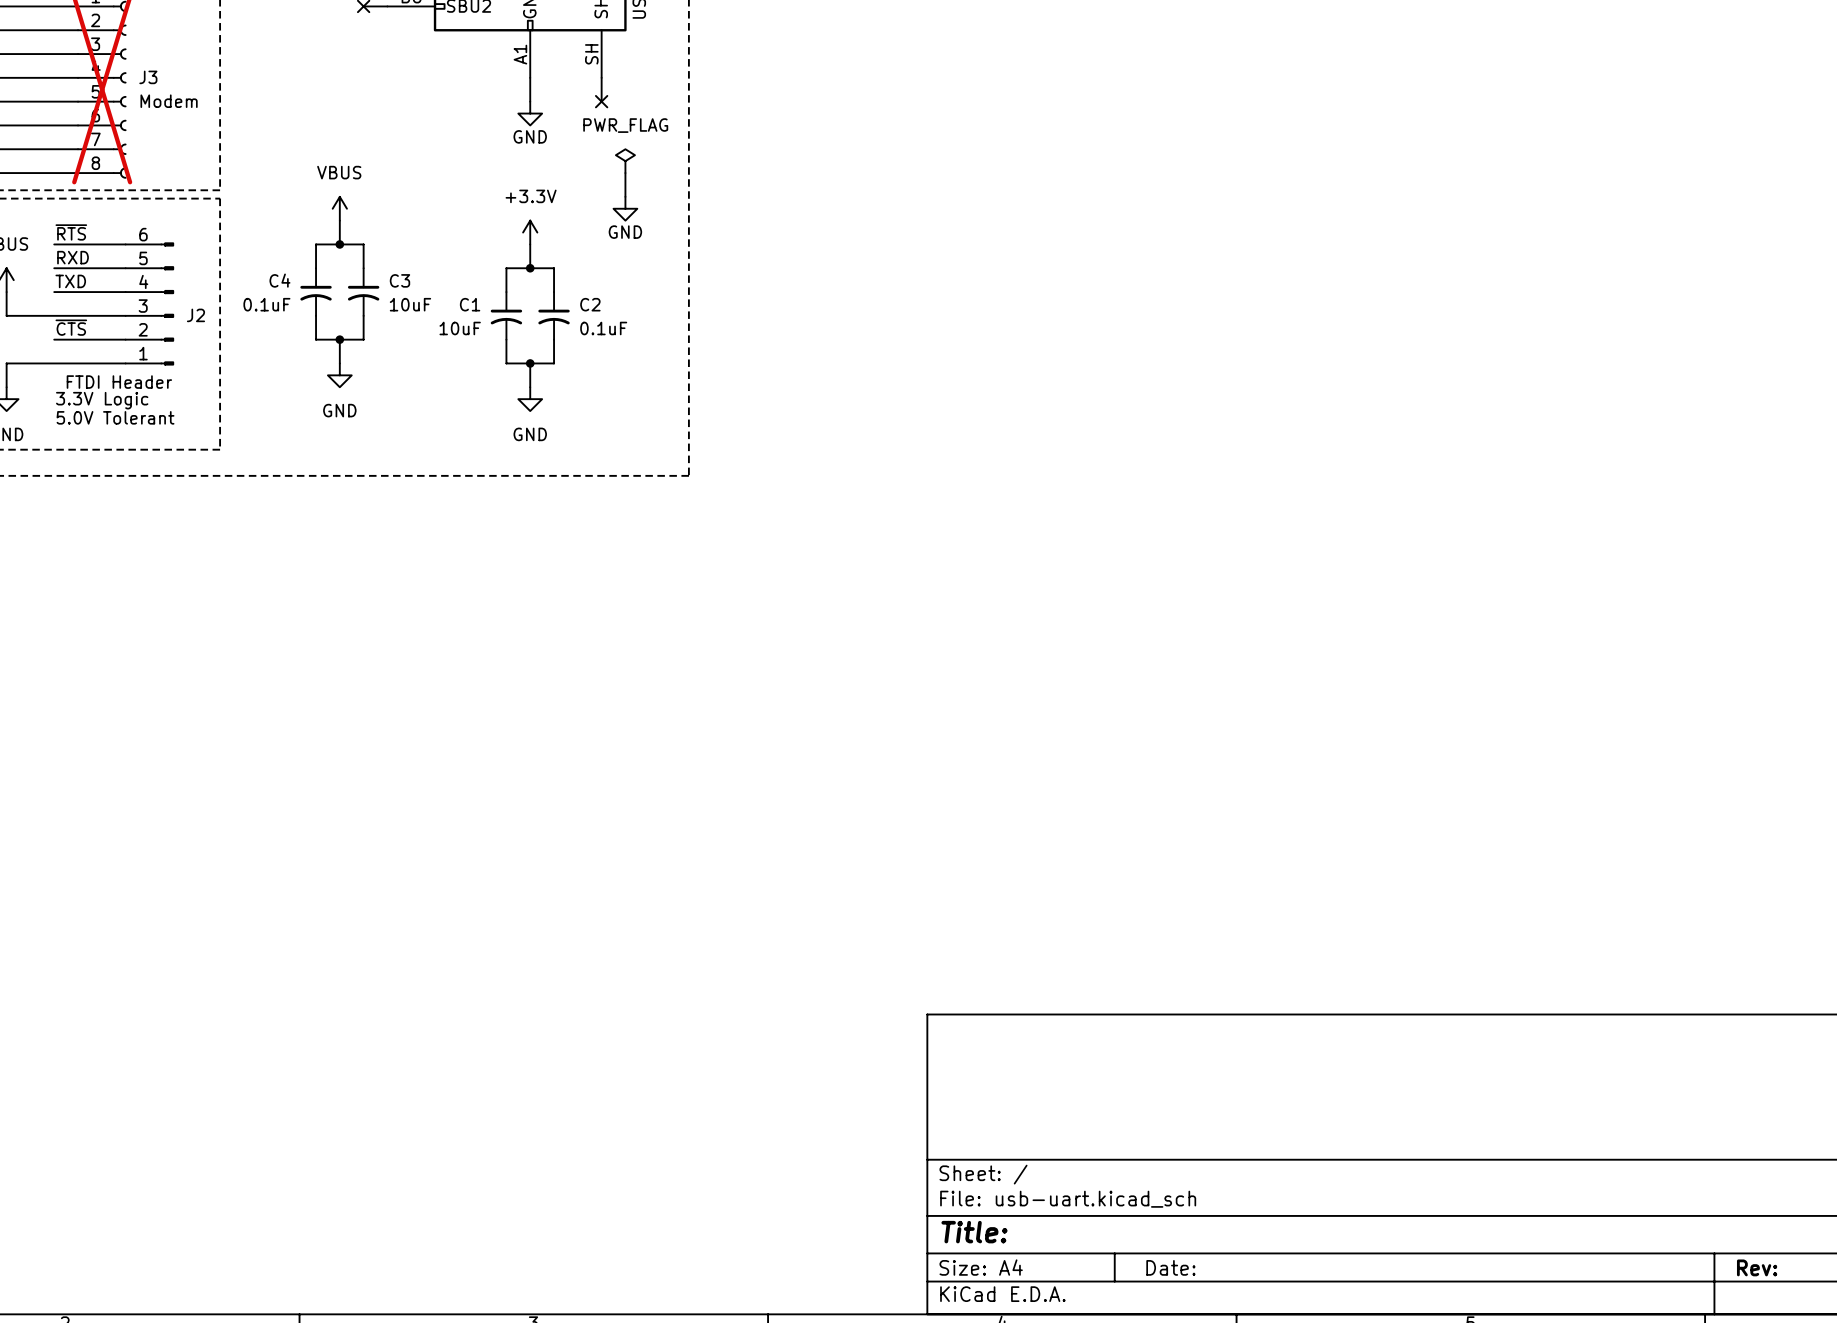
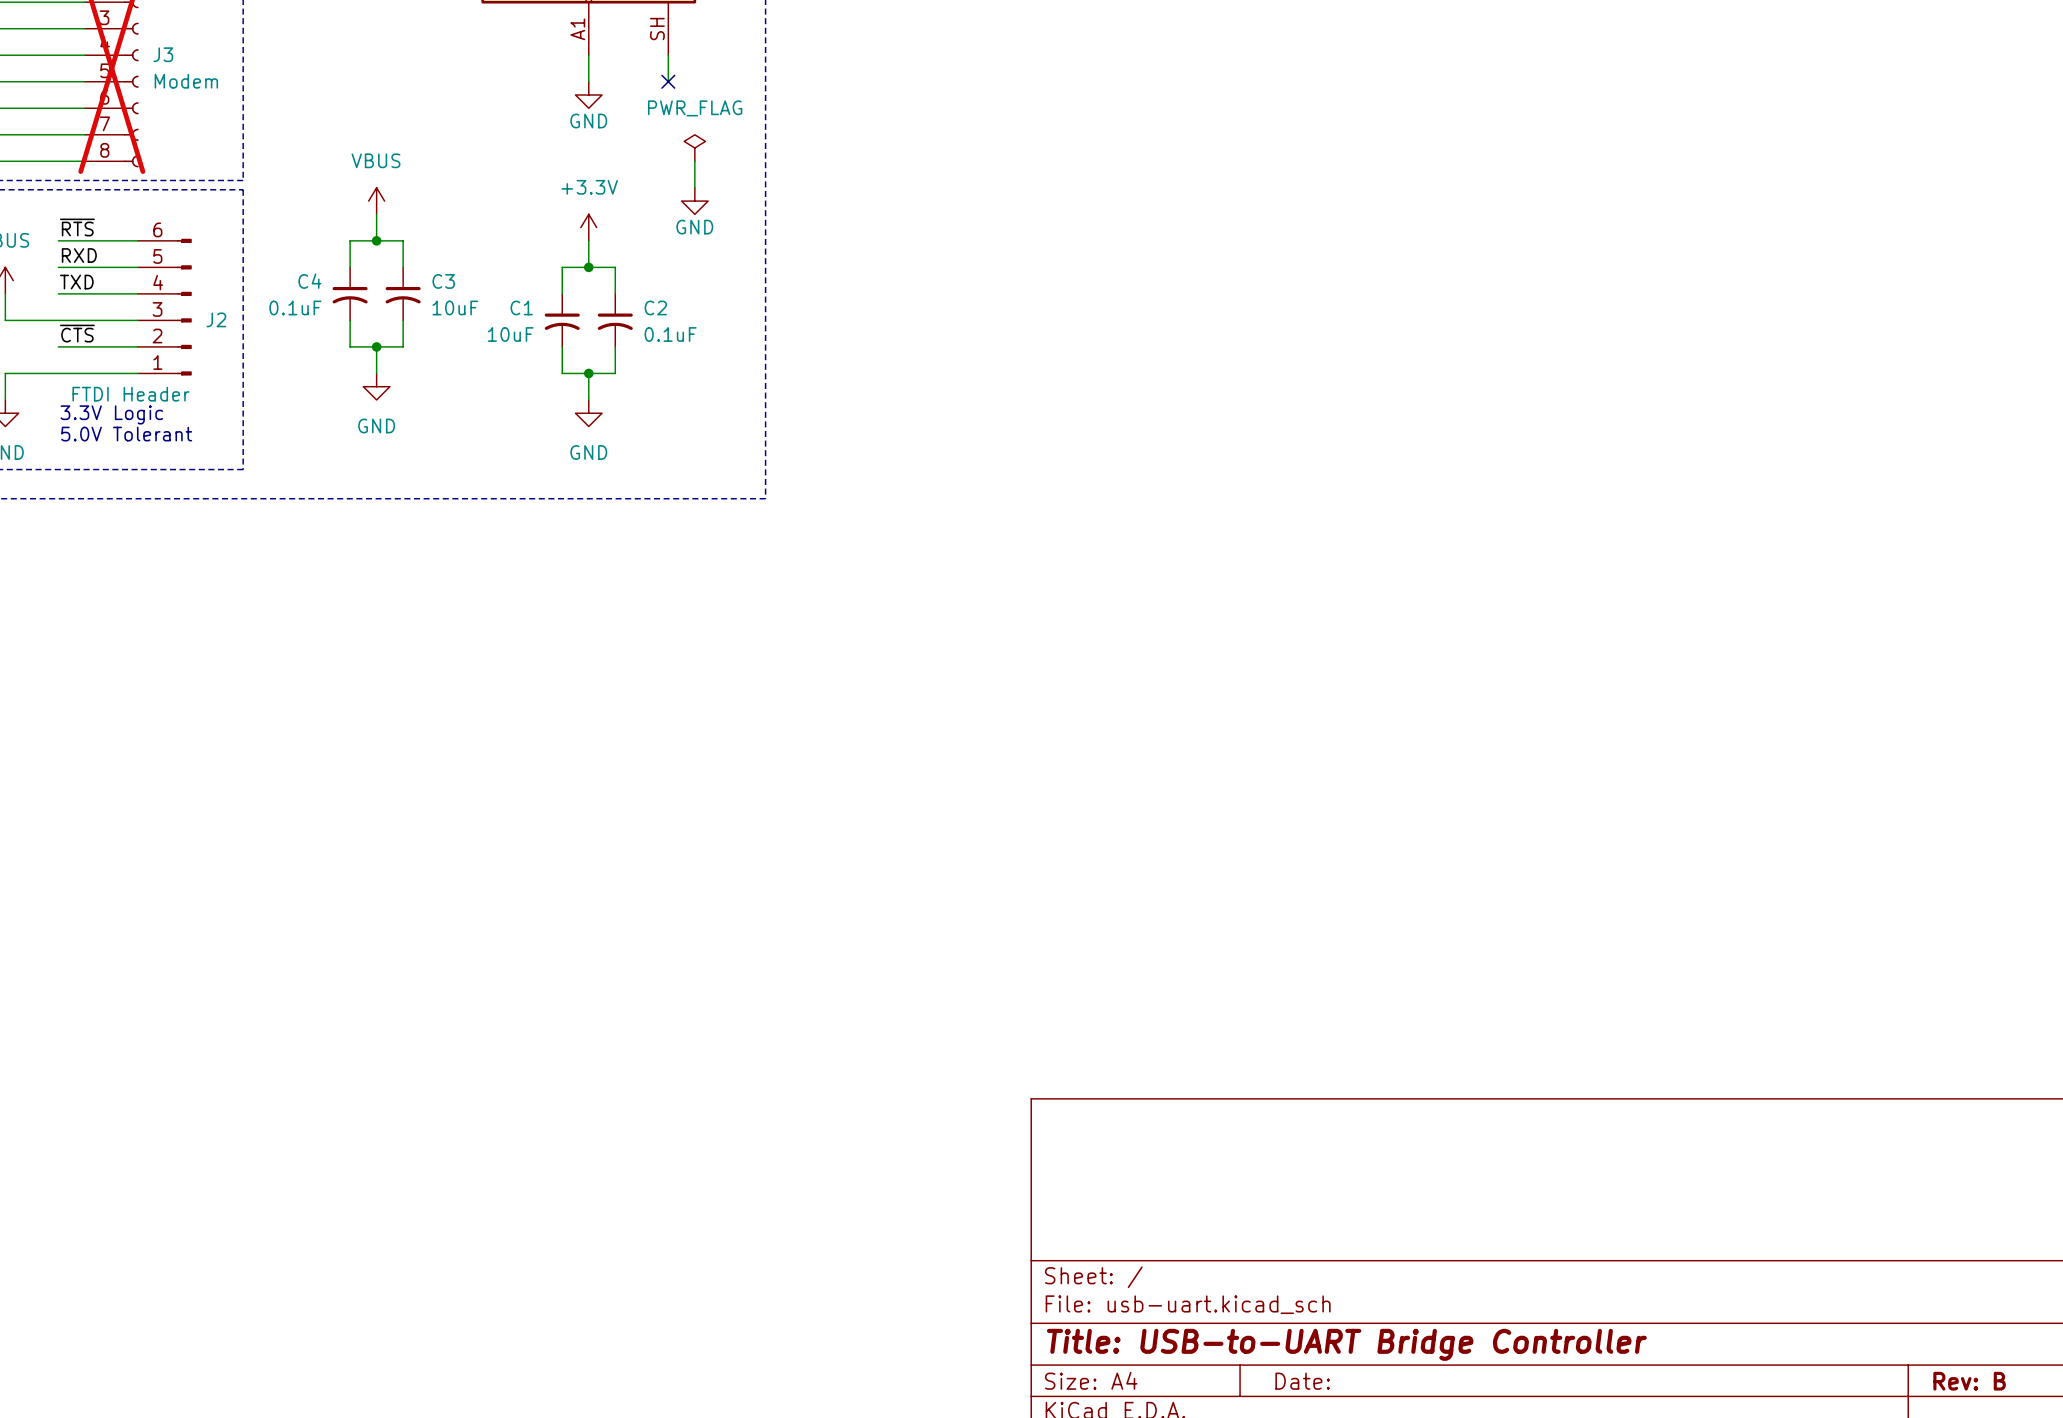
title block: Title: (974, 1232) -> Title: USB-to-UART Bridge Controller (1346, 1344)
title block: Rev: (1757, 1267) -> Rev: B (1969, 1381)

